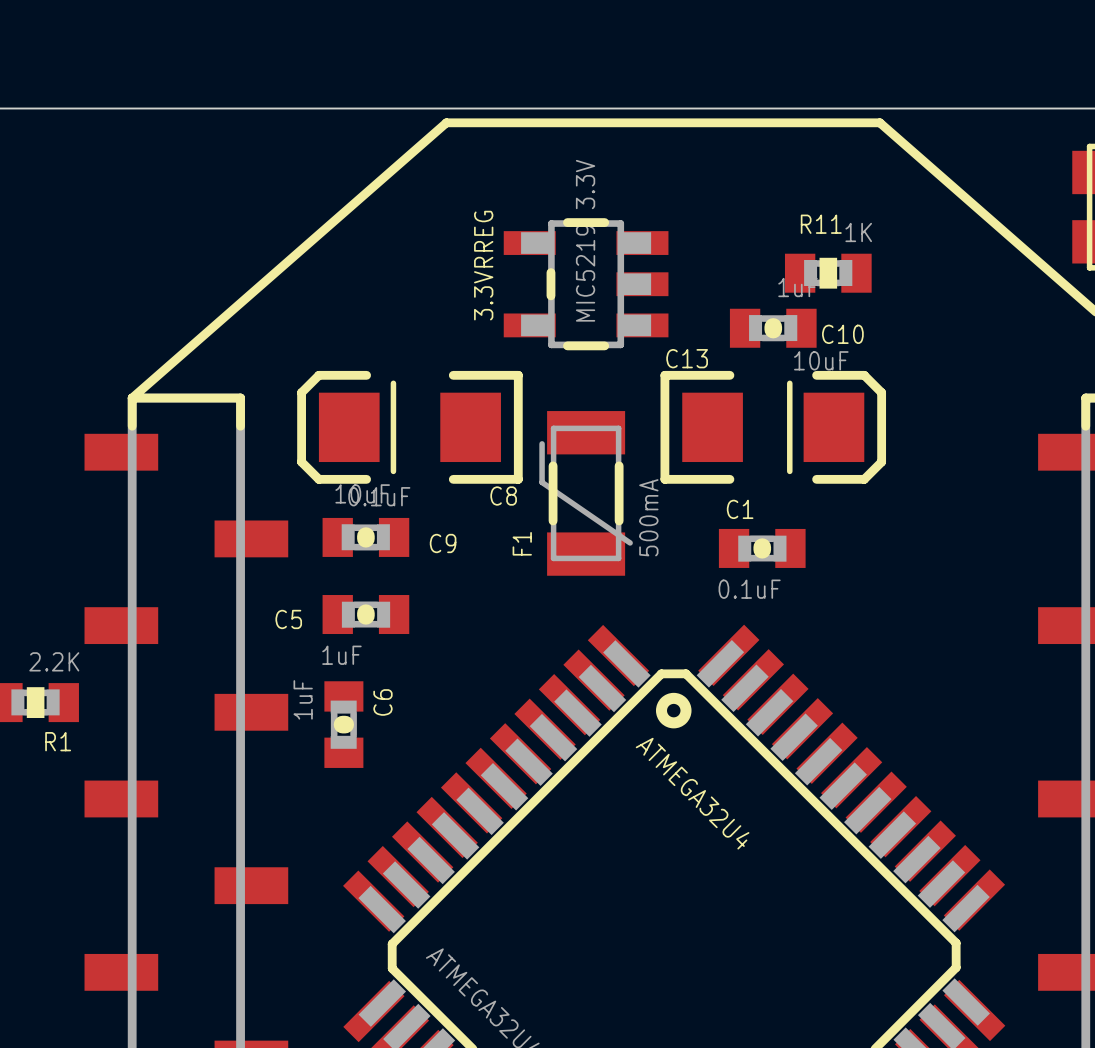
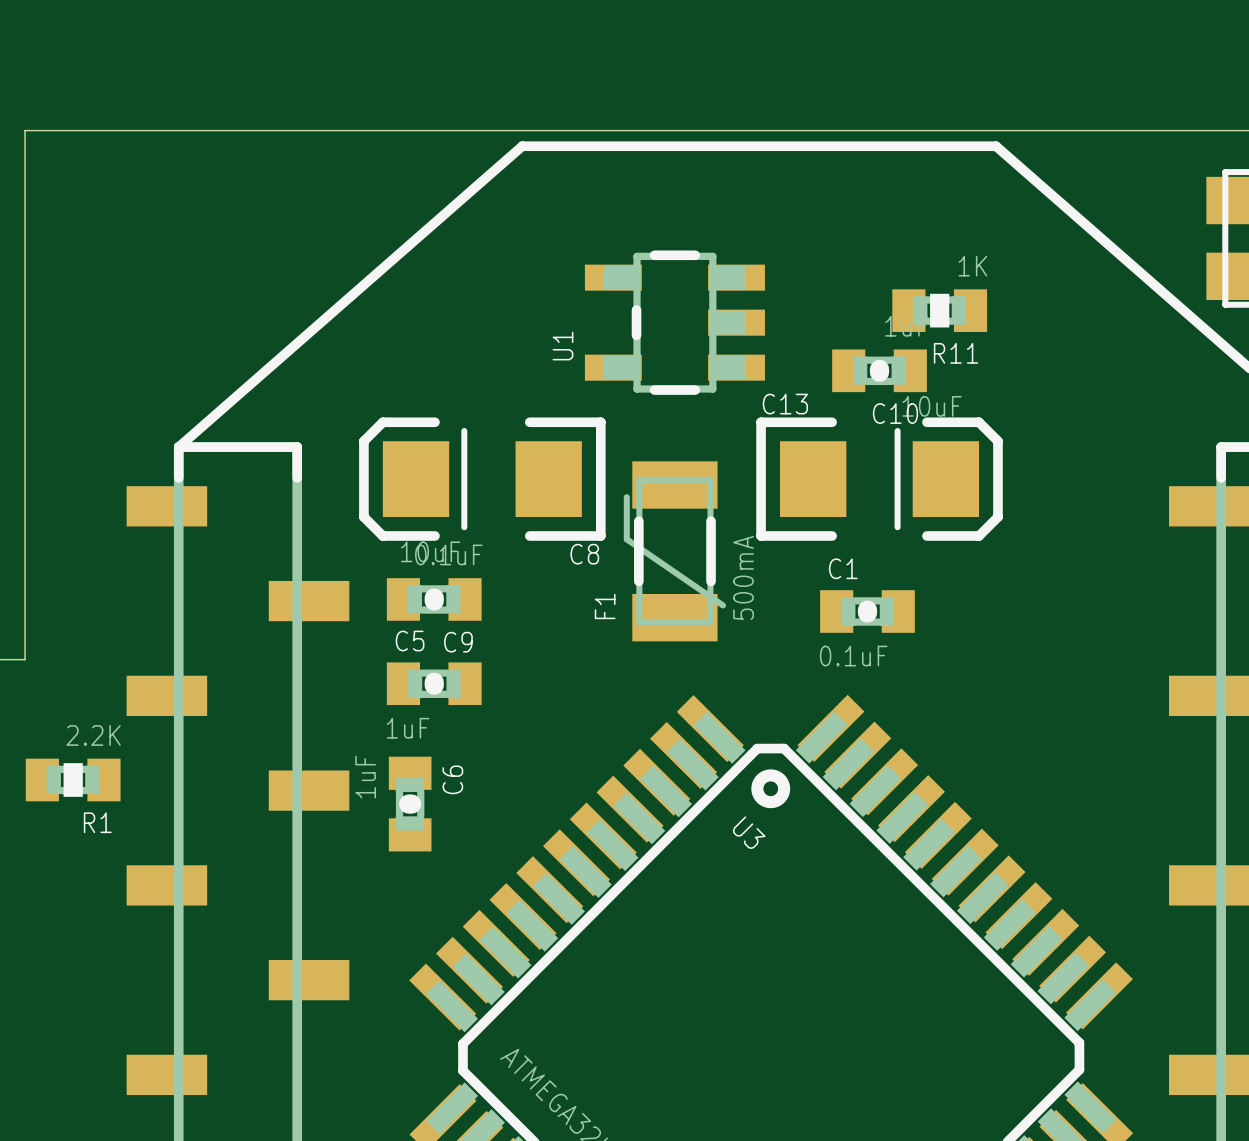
R11 name position: R11 (821, 224) -> R11 (956, 353)
3.3VRREG value: MIC5219 3.3V (585, 240) -> none
3.3VRREG name: 3.3VRREG (483, 265) -> U1 (563, 346)
C10 name position: C10 (842, 334) -> C10 (895, 413)
C9 name position: C9 (443, 543) -> C9 (458, 642)
C5 name position: C5 (288, 619) -> C5 (410, 640)
ATMEGA32U4 name: ATMEGA32U4 (692, 793) -> U3 (749, 832)

